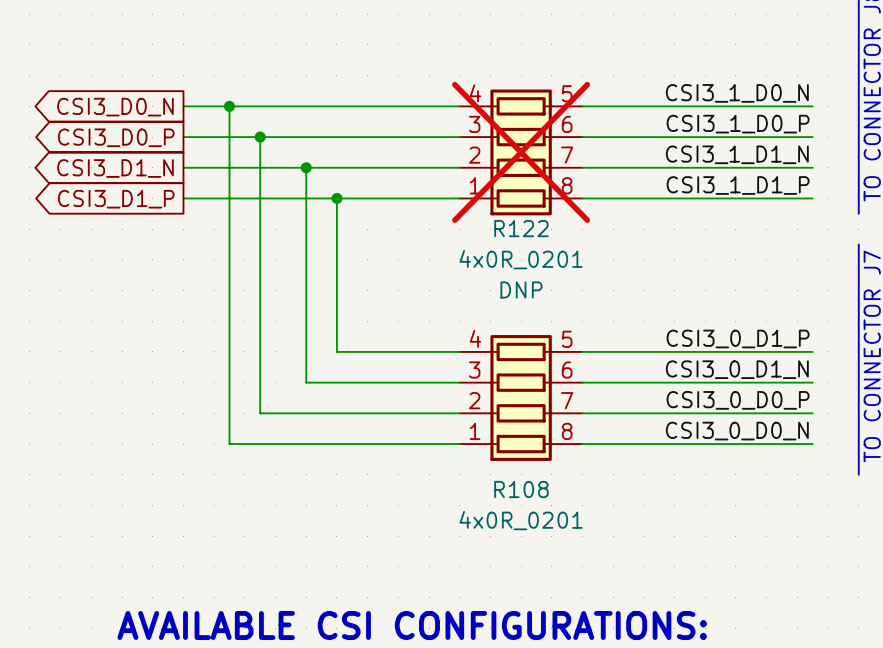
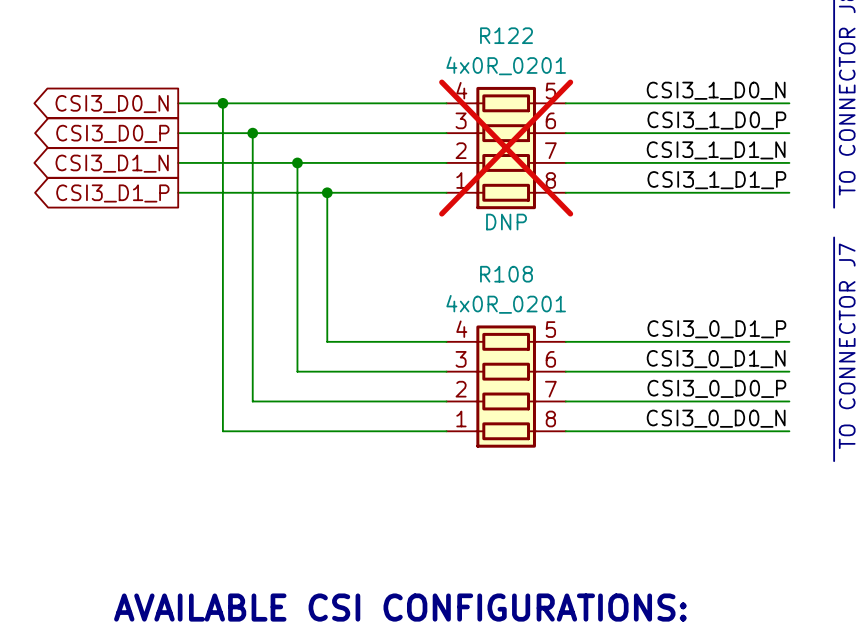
R122 name position: R122 (521, 228) -> R122 (506, 35)
R122 text position: 4x0R_0201 (521, 259) -> 4x0R_0201 (506, 65)
R122 text position: DNP (521, 289) -> DNP (506, 222)
R108 name position: R108 (521, 489) -> R108 (506, 274)
R108 text position: 4x0R_0201 (521, 520) -> 4x0R_0201 (506, 304)

